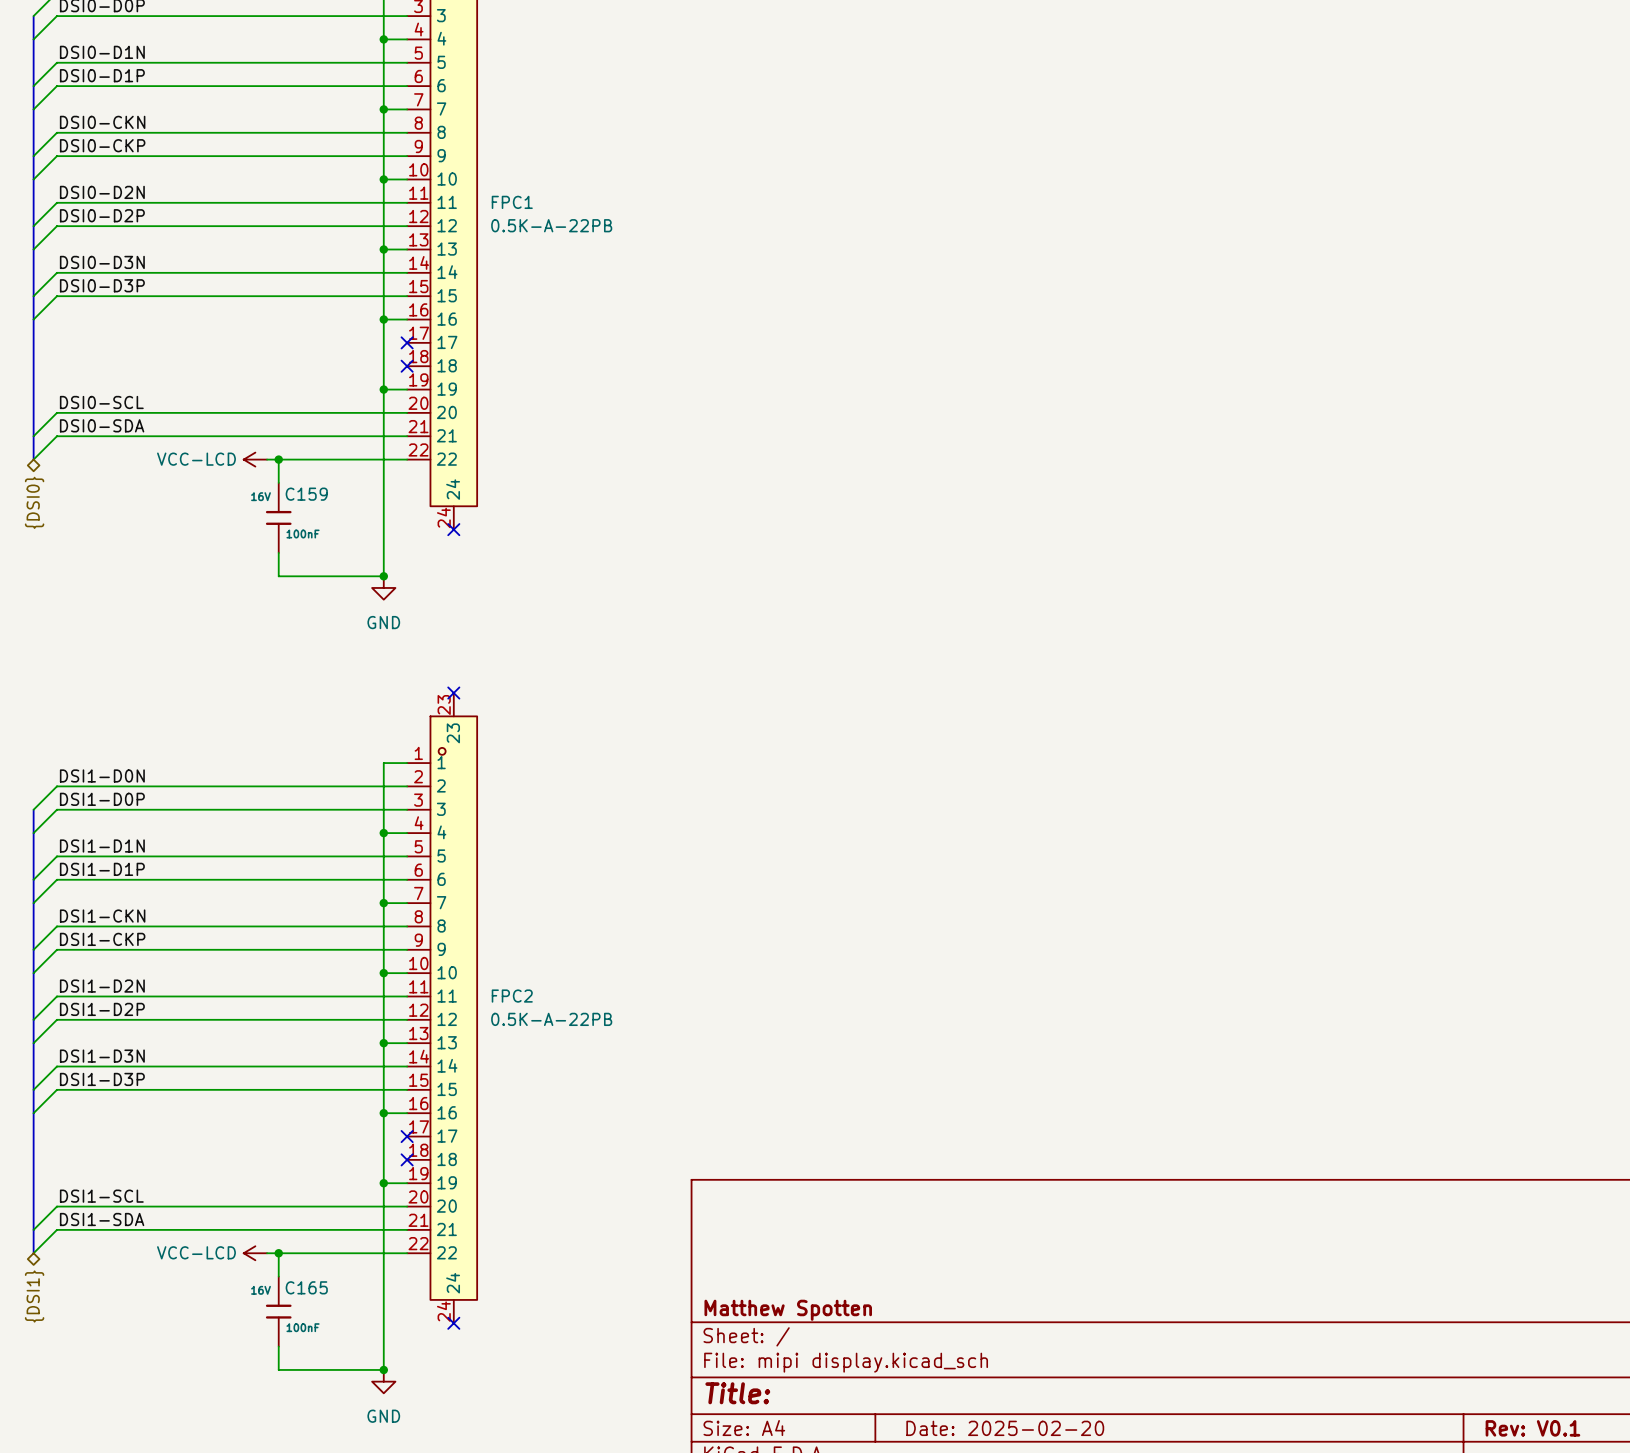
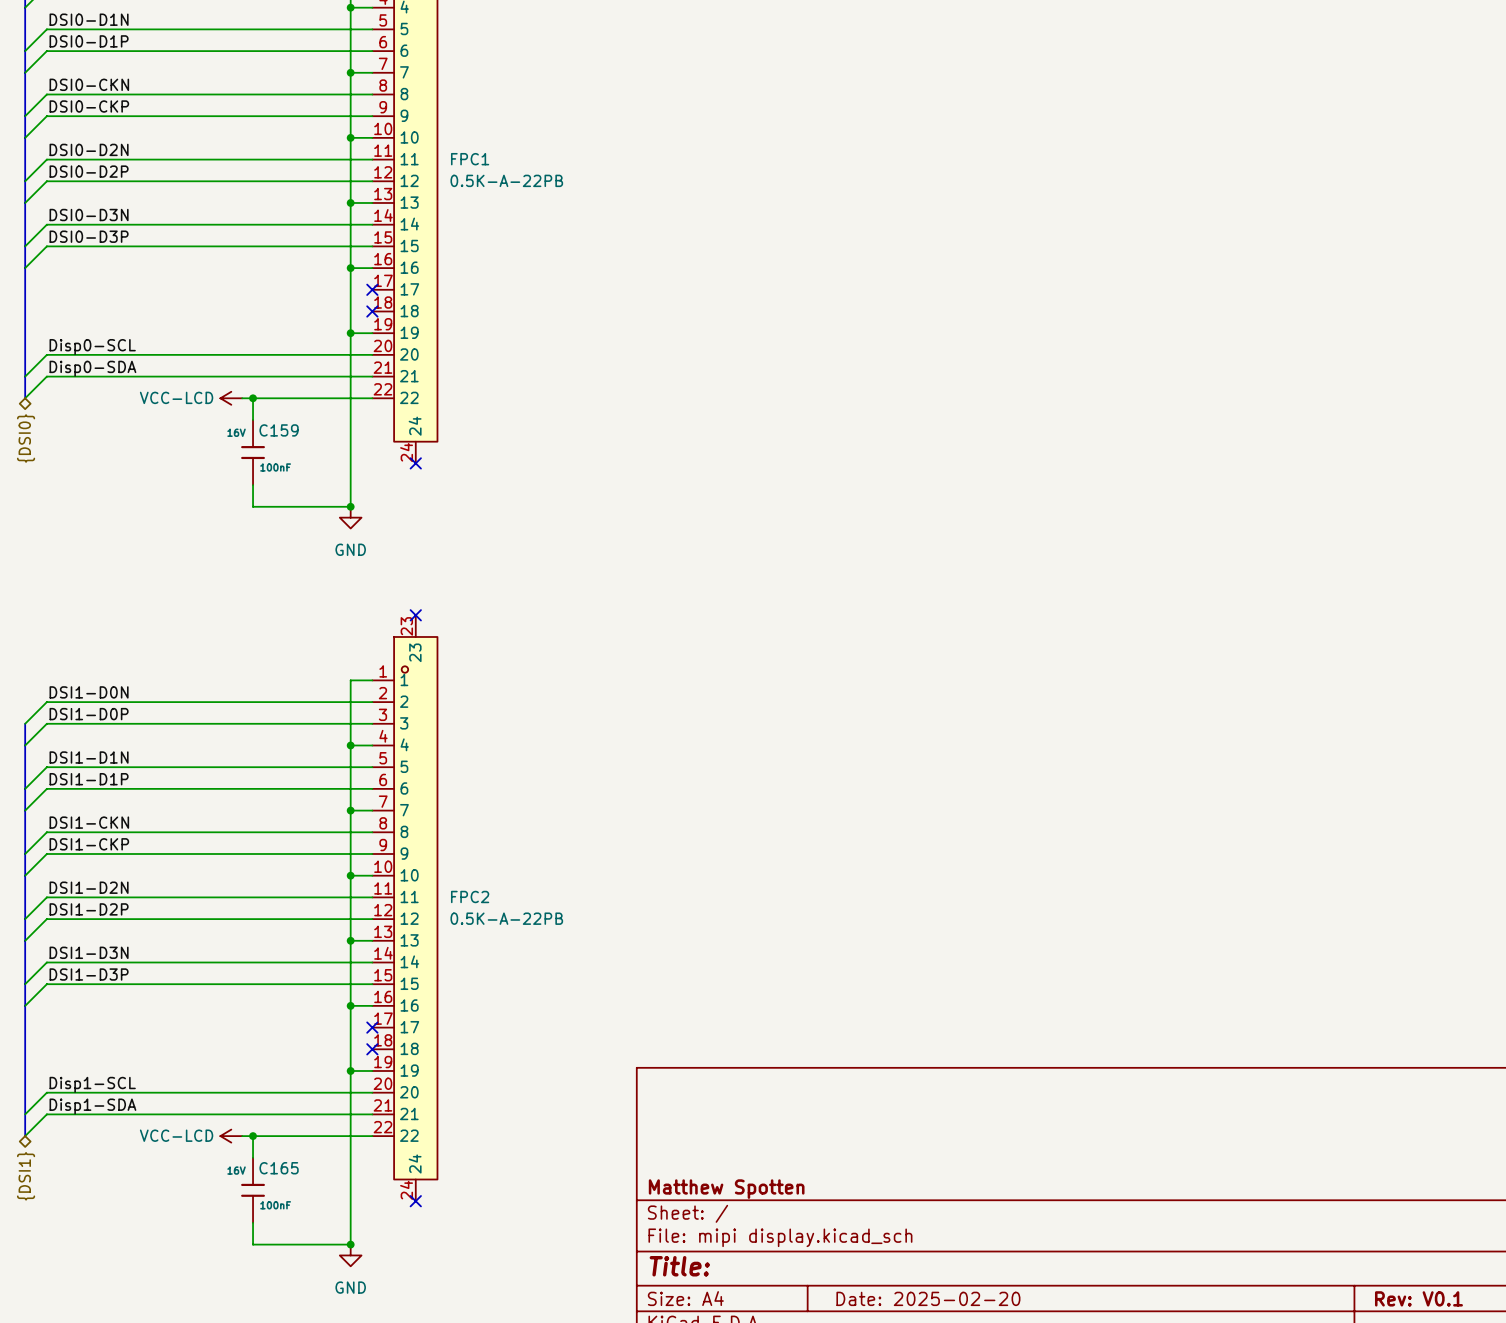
label: DSI0-SCL (101, 402) -> Disp0-SCL (92, 347)
label: DSI0-SDA (102, 425) -> Disp0-SDA (92, 368)
label: DSI1-SCL (101, 1196) -> Disp1-SCL (92, 1084)
label: DSI1-SDA (102, 1219) -> Disp1-SDA (92, 1106)

